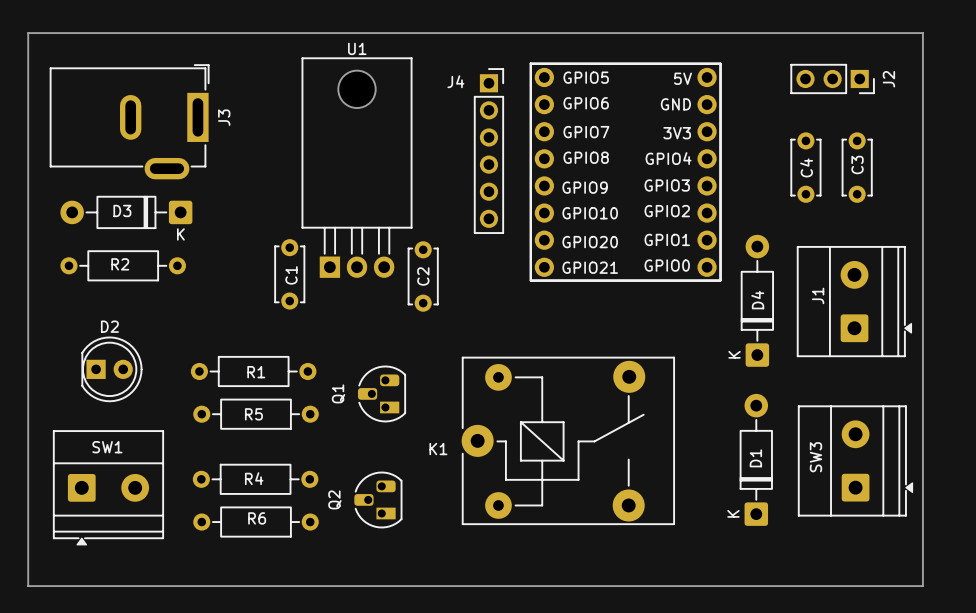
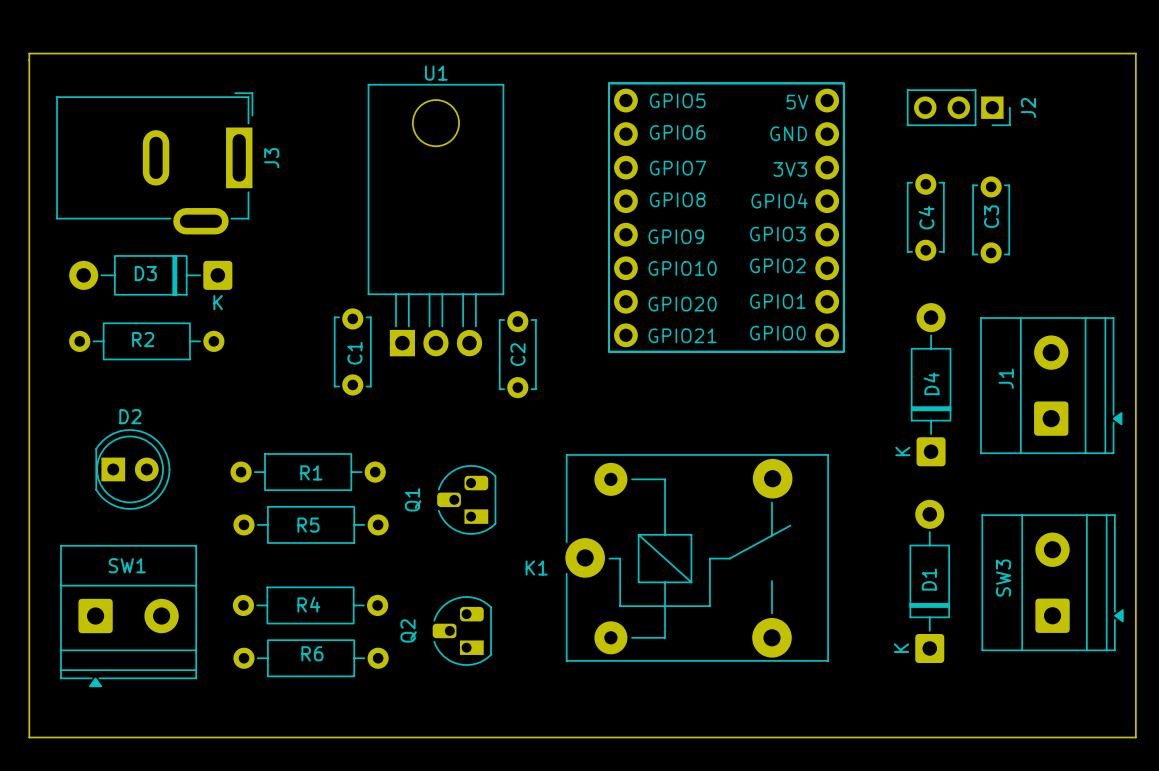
J2 position: (832, 78) -> (958, 107)
J4: (488, 151) -> none
C4: none -> (925, 217)
C4 name: C4 (806, 167) -> C3 (991, 216)
C3: (857, 167) -> none
part position: (625, 172) -> (726, 217)

